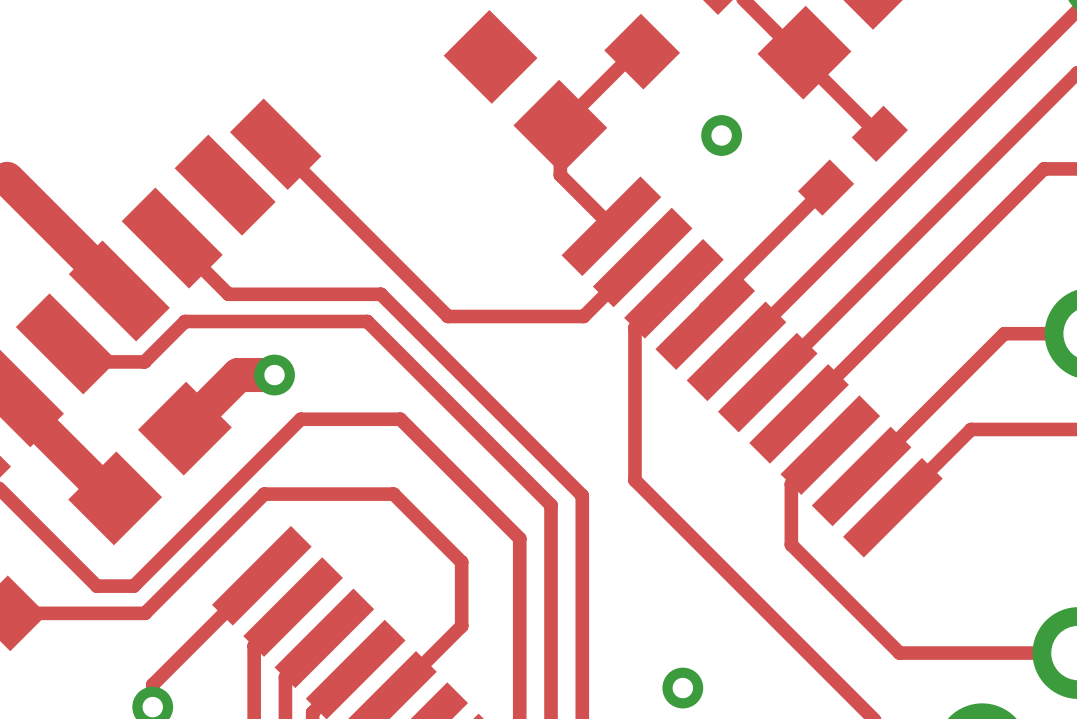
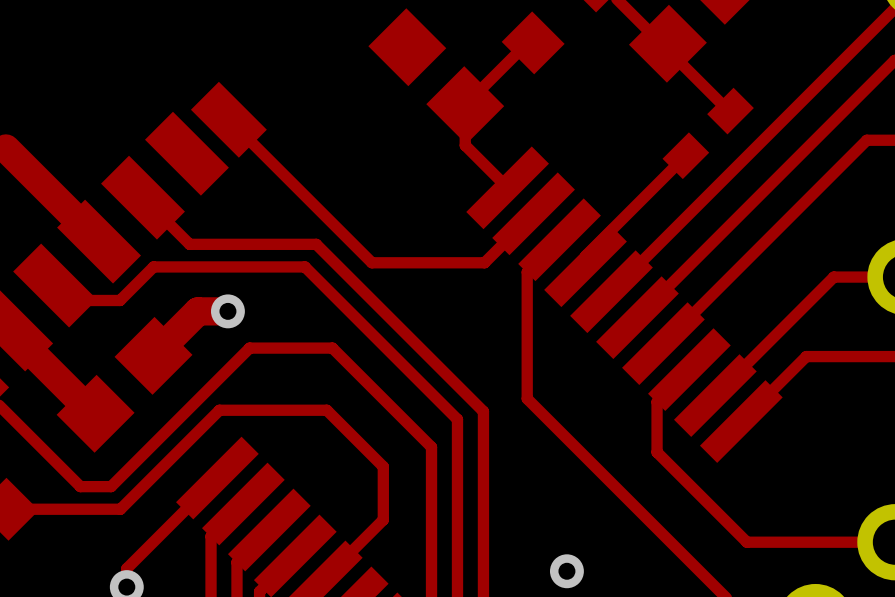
via: (721, 135) -> none

